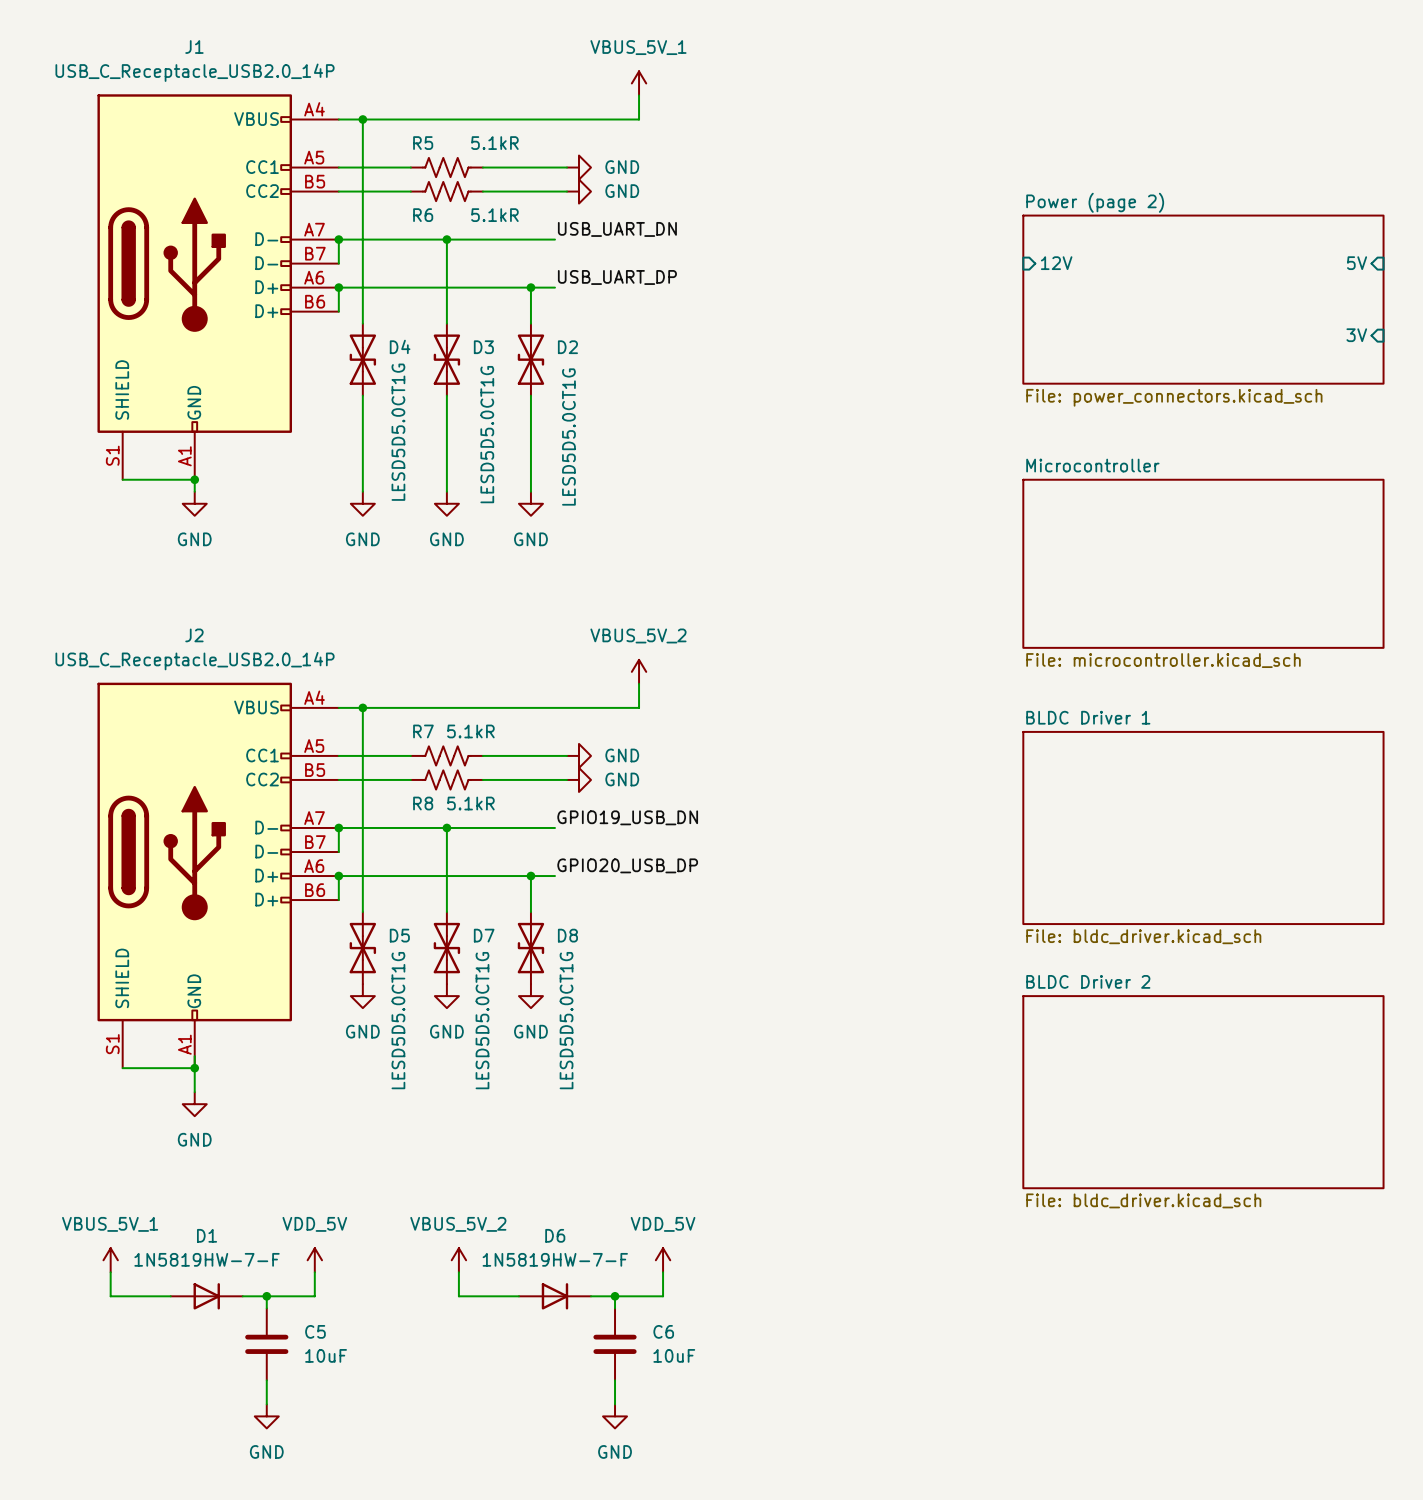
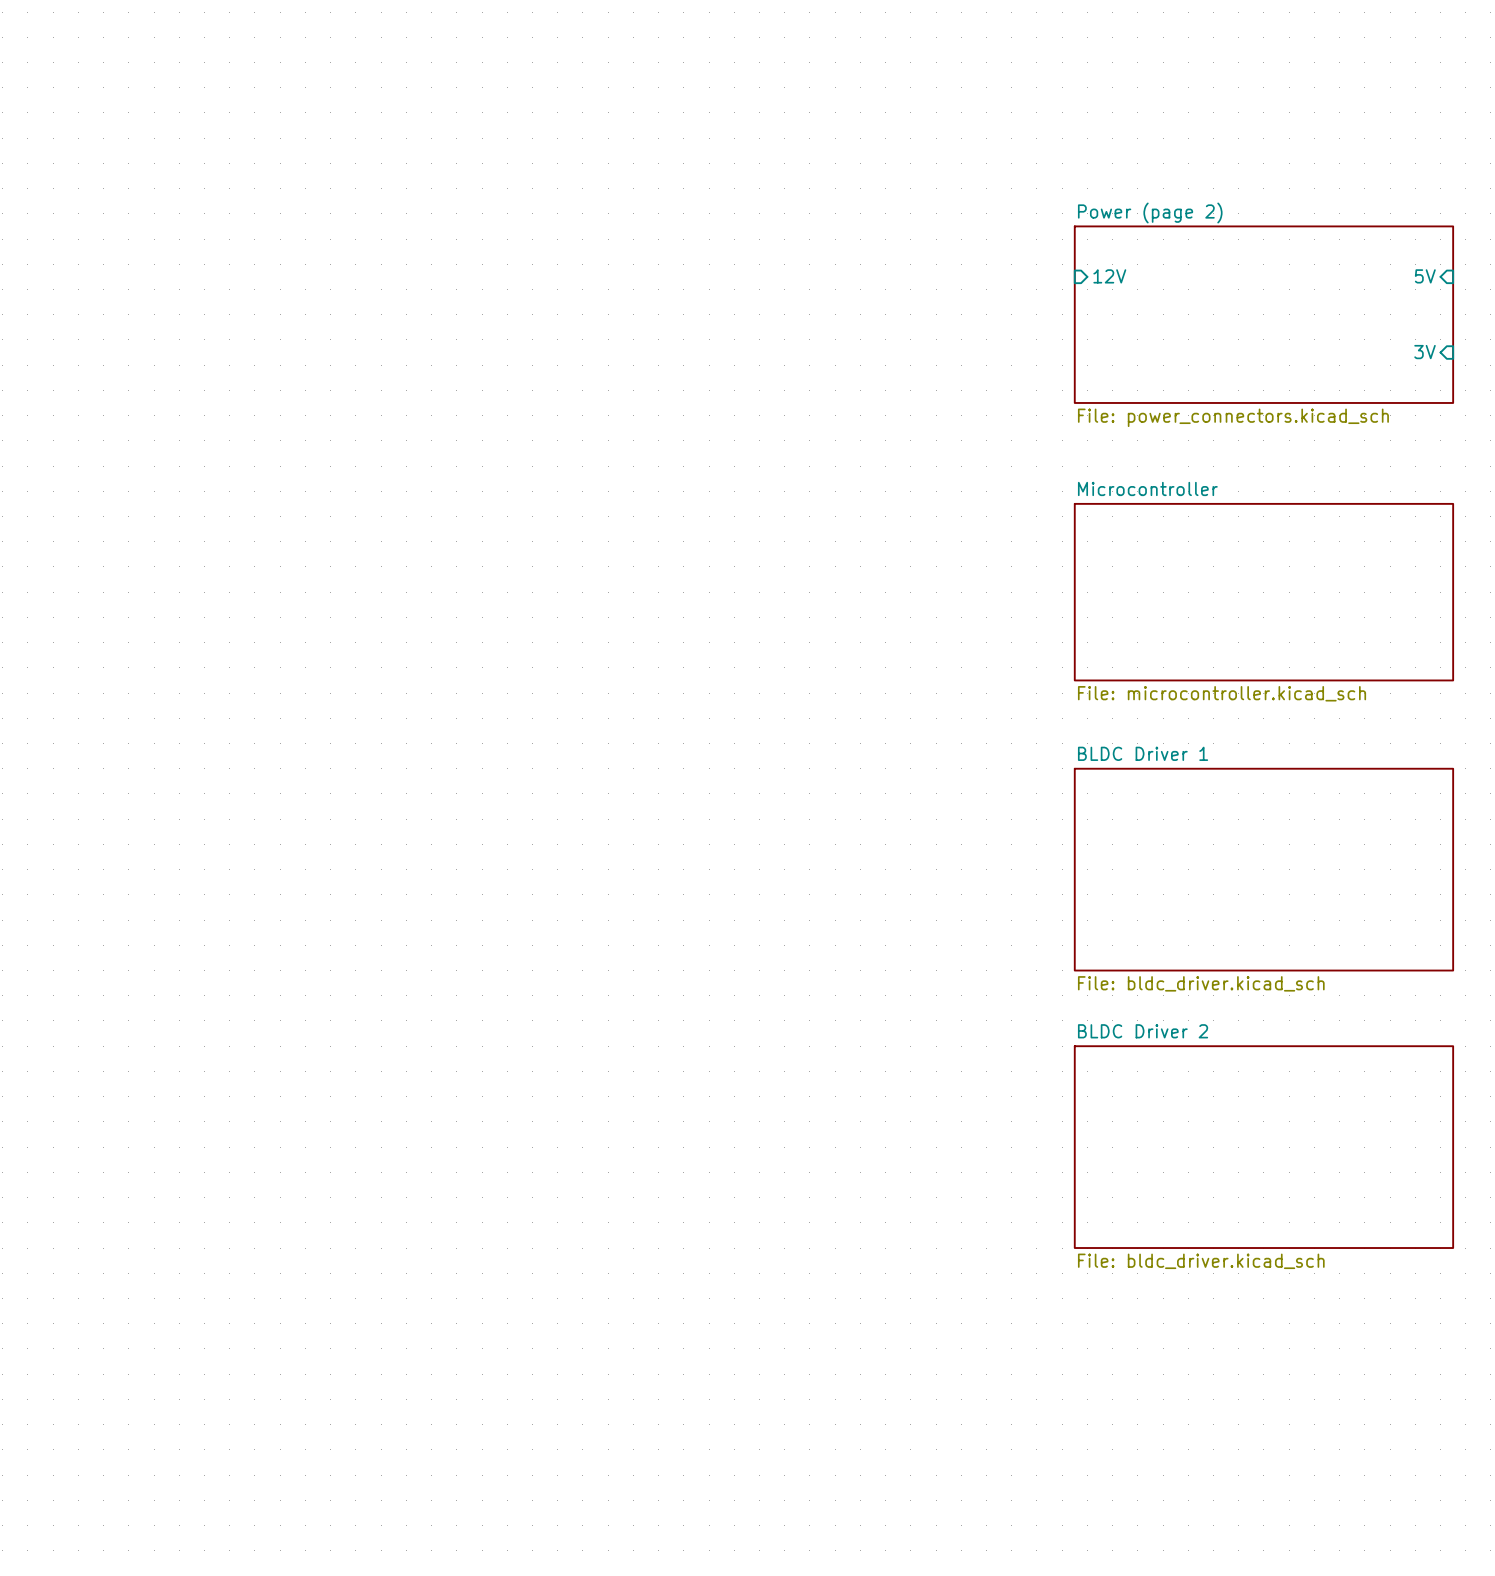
power symbol: VBUS_5V_1 (639, 83) -> none
wire: (639, 95) (639, 119) (338, 119) -> none
wire: (362, 119) (362, 323) -> none
junction: (362, 119) -> none
wire: (338, 167) (410, 167) -> none
R5: 5.1kR (446, 167) -> none
wire: (482, 167) (566, 167) -> none
power symbol: GND (579, 167) -> none
wire: (338, 191) (410, 191) -> none
R6: 5.1kR (446, 191) -> none
wire: (482, 191) (566, 191) -> none
power symbol: GND (579, 191) -> none
label: USB_UART_DN (617, 229) -> none
junction: (338, 239) -> none
wire: (446, 239) (446, 323) -> none
junction: (446, 239) -> none
wire: (554, 239) (338, 239) (338, 263) -> none
label: USB_UART_DP (617, 277) -> none
J1: USB_C_Receptacle_USB2.0_14P (218, 287) -> none
junction: (338, 287) -> none
wire: (530, 287) (530, 323) -> none
junction: (530, 287) -> none
wire: (554, 287) (338, 287) (338, 311) -> none
D4: LESD5D5.0CT1G (362, 359) -> none
D3: LESD5D5.0CT1G (446, 359) -> none
D2: LESD5D5.0CT1G (530, 359) -> none
wire: (362, 395) (362, 491) -> none
wire: (446, 395) (446, 491) -> none
wire: (530, 395) (530, 491) -> none
wire: (122, 479) (194, 479) (194, 491) -> none
junction: (194, 479) -> none
power symbol: GND (194, 503) -> none
power symbol: GND (362, 503) -> none
power symbol: GND (446, 503) -> none
power symbol: GND (530, 503) -> none
power symbol: VBUS_5V_2 (639, 671) -> none
wire: (639, 683) (639, 707) (338, 707) -> none
wire: (362, 707) (362, 912) -> none
junction: (362, 707) -> none
wire: (338, 755) (410, 755) -> none
R7: 5.1kR (446, 755) -> none
wire: (482, 755) (566, 755) -> none
power symbol: GND (579, 755) -> none
wire: (338, 779) (410, 779) -> none
R8: 5.1kR (446, 779) -> none
wire: (482, 779) (566, 779) -> none
power symbol: GND (579, 779) -> none
label: GPIO19_USB_DN (627, 817) -> none
junction: (338, 827) -> none
wire: (446, 827) (446, 912) -> none
junction: (446, 827) -> none
wire: (554, 827) (338, 827) (338, 852) -> none
label: GPIO20_USB_DP (627, 865) -> none
J2: USB_C_Receptacle_USB2.0_14P (218, 875) -> none
junction: (338, 876) -> none
wire: (530, 876) (530, 912) -> none
junction: (530, 876) -> none
wire: (554, 876) (338, 876) (338, 900) -> none
D5: LESD5D5.0CT1G (362, 948) -> none
D7: LESD5D5.0CT1G (446, 948) -> none
D8: LESD5D5.0CT1G (530, 948) -> none
power symbol: GND (362, 996) -> none
power symbol: GND (446, 996) -> none
power symbol: GND (530, 996) -> none
wire: (194, 1056) (194, 1092) -> none
wire: (122, 1068) (194, 1068) -> none
junction: (194, 1068) -> none
power symbol: GND (194, 1104) -> none
power symbol: VBUS_5V_1 (110, 1260) -> none
power symbol: VDD_5V (314, 1260) -> none
power symbol: VBUS_5V_2 (458, 1260) -> none
power symbol: VDD_5V (663, 1260) -> none
wire: (110, 1272) (110, 1296) (170, 1296) -> none
wire: (314, 1272) (314, 1296) (242, 1296) -> none
wire: (458, 1272) (458, 1296) (518, 1296) -> none
wire: (663, 1272) (663, 1296) (591, 1296) -> none
D1: 1N5819HW-7-F (206, 1296) -> none
wire: (266, 1296) (266, 1308) -> none
junction: (266, 1296) -> none
D6: 1N5819HW-7-F (554, 1296) -> none
wire: (615, 1296) (615, 1308) -> none
junction: (615, 1296) -> none
C5: 10uF (266, 1344) -> none
C6: 10uF (615, 1344) -> none
wire: (266, 1380) (266, 1404) -> none
wire: (615, 1380) (615, 1404) -> none
power symbol: GND (266, 1416) -> none
power symbol: GND (615, 1416) -> none

